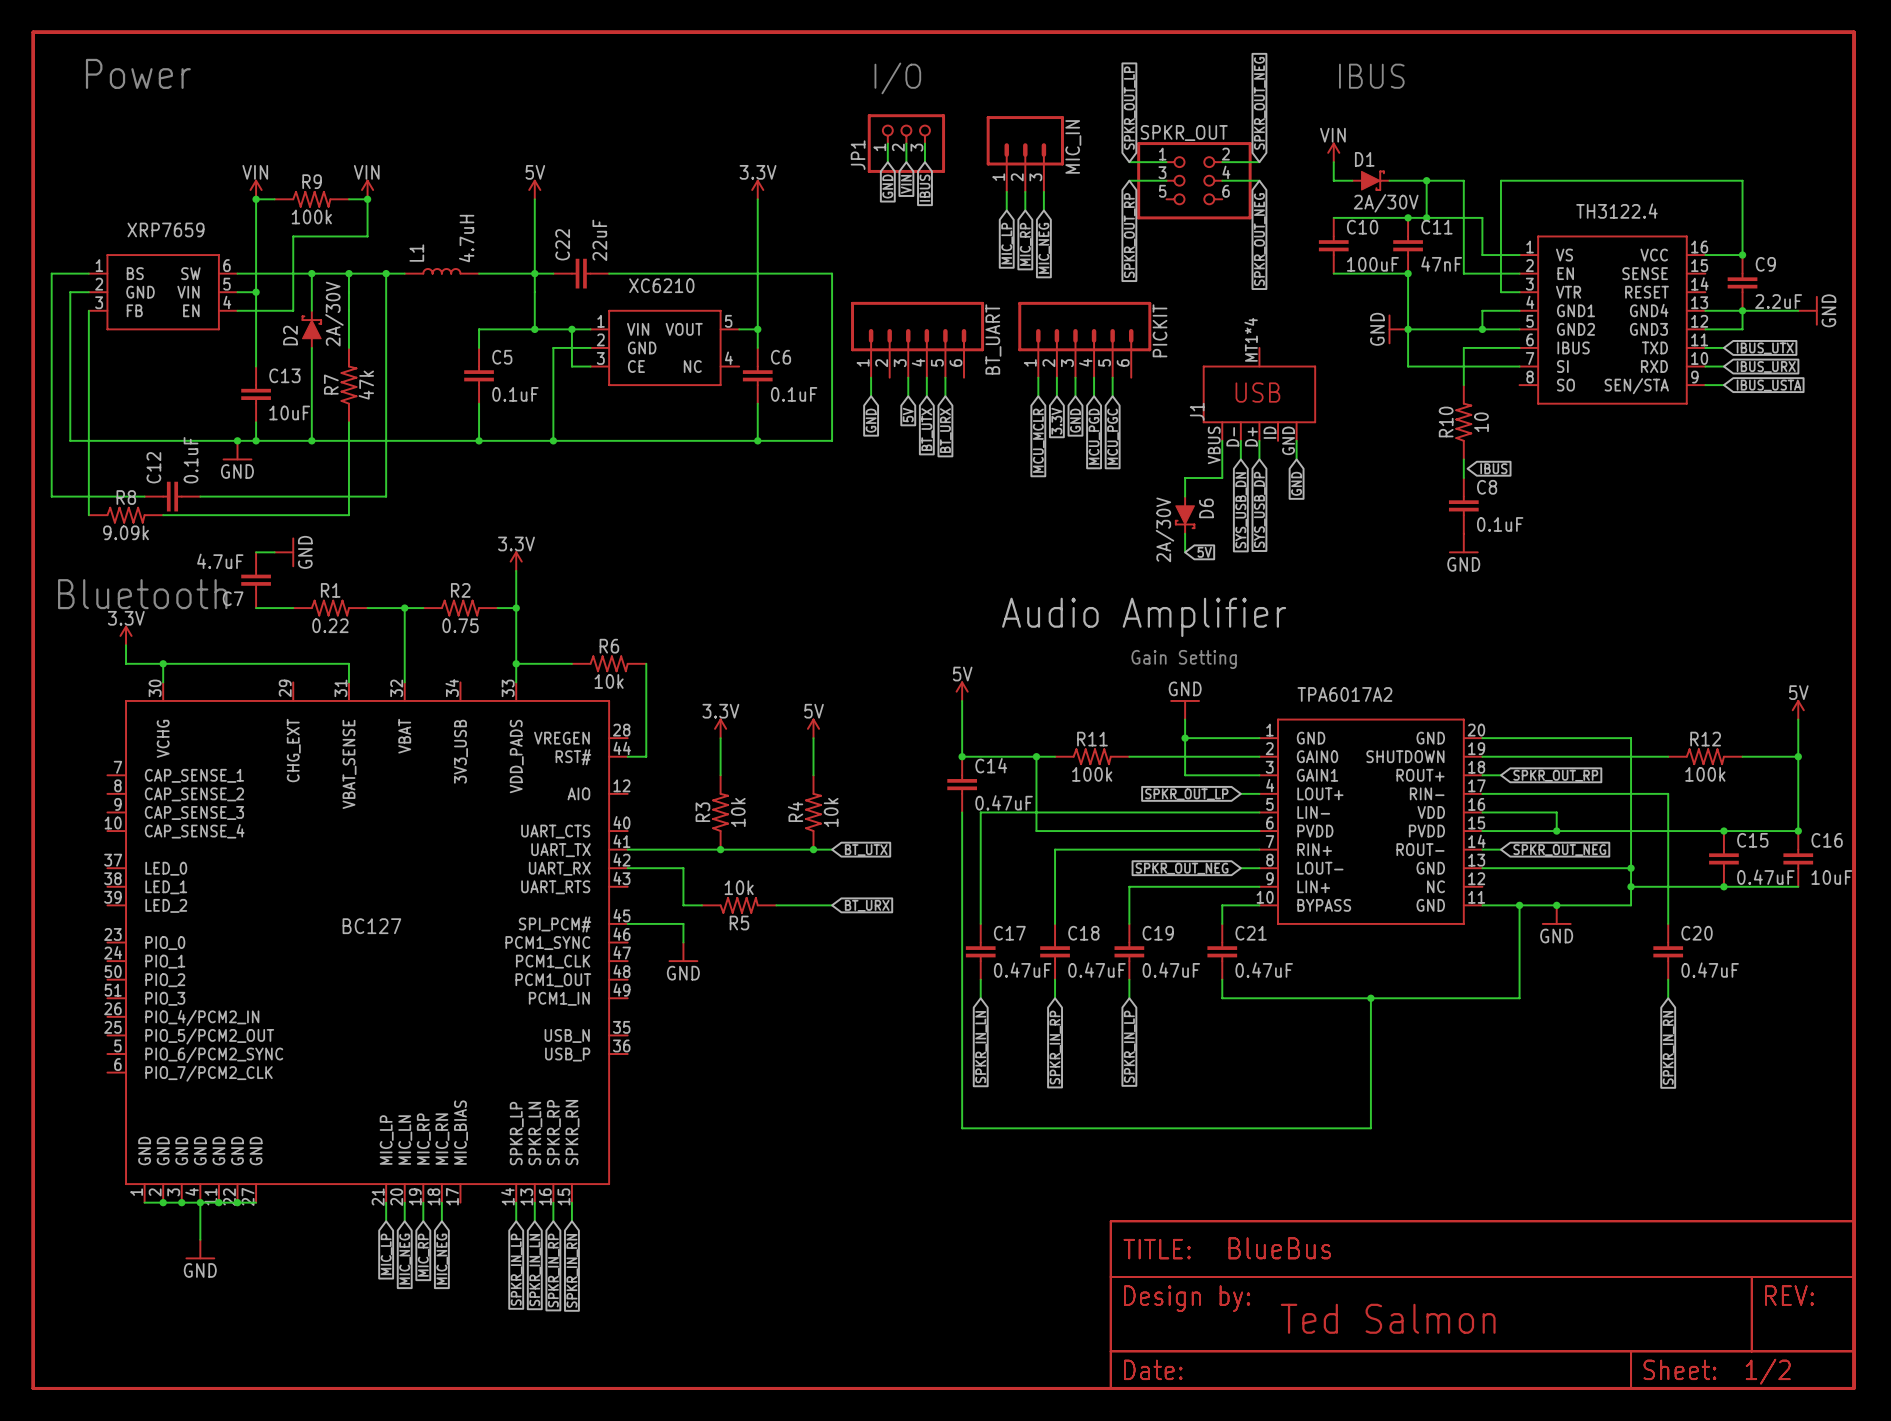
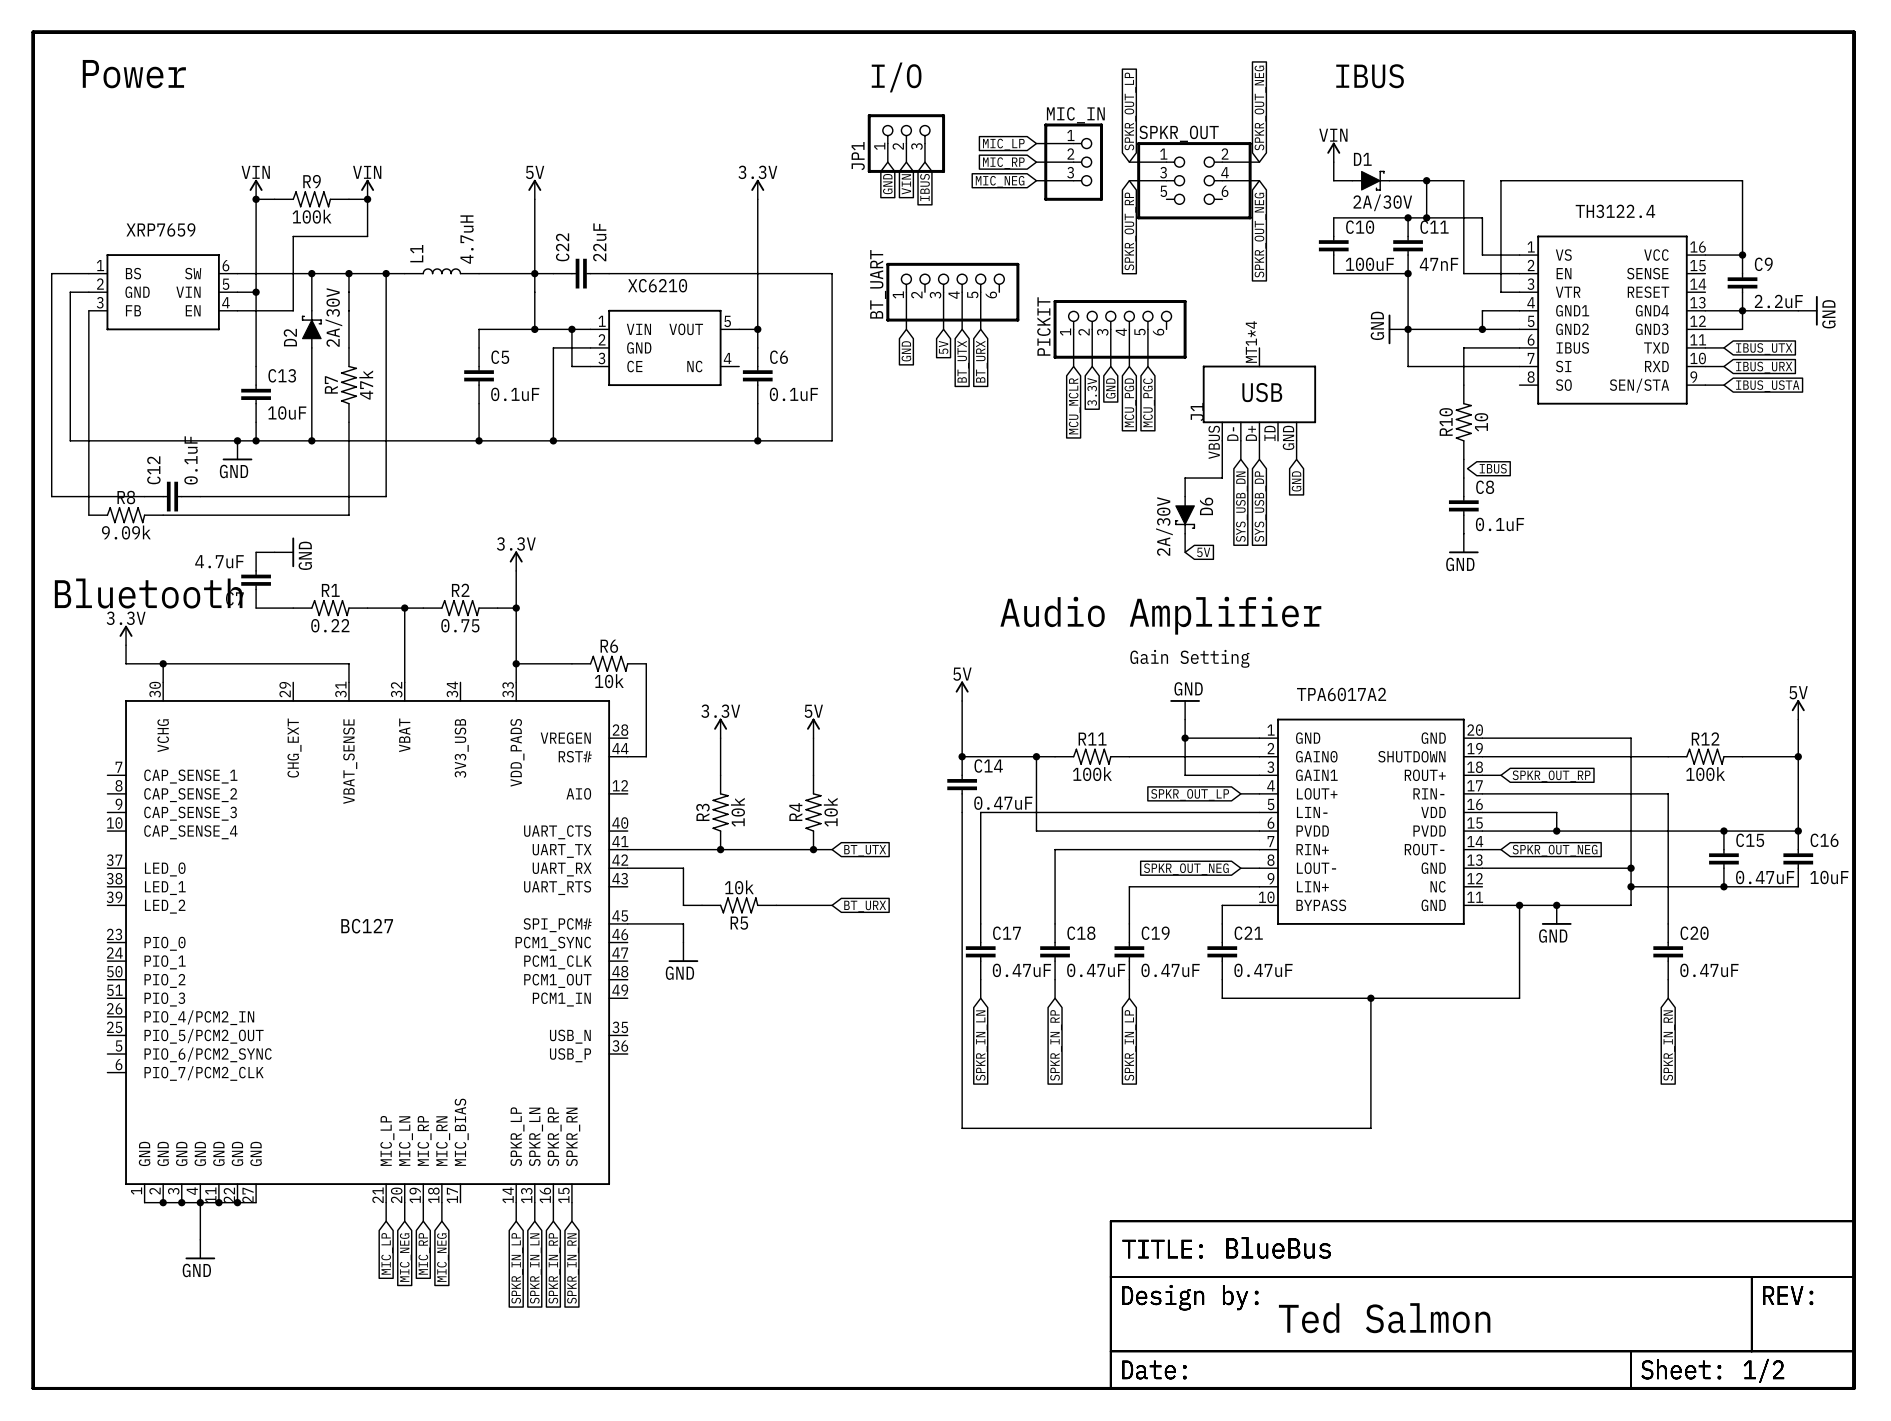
wire: none -> (1036, 143) (1073, 143)
MIC_IN: (1025, 153) -> none
wire: none -> (1036, 162) (1073, 162)
MIC_IN: none -> (1073, 162)
wire: none -> (1036, 180) (1073, 180)
wire: (1006, 191) (1006, 210) -> none
wire: (1025, 191) (1025, 210) -> none
wire: (1043, 191) (1043, 210) -> none
global label rotation: 0° (1007, 243) -> 90° clockwise (1003, 144)
global label position: MIC_LP (1007, 243) -> MIC_LP (1003, 144)
global label rotation: 0° (1025, 244) -> 90° clockwise (1003, 163)
global label position: MIC_RP (1025, 244) -> MIC_RP (1003, 163)
global label rotation: 0° (1044, 248) -> 90° clockwise (1000, 181)
global label position: MIC_NEG (1044, 248) -> MIC_NEG (1000, 181)
wire: none -> (906, 292) (906, 329)
wire: none -> (943, 292) (943, 329)
BT_UART: none -> (952, 292)
wire: none -> (962, 292) (962, 329)
wire: none -> (980, 292) (980, 329)
wire: none -> (1073, 329) (1073, 366)
wire: none -> (1092, 329) (1092, 366)
wire: none -> (1110, 329) (1110, 366)
PICKIT: none -> (1120, 329)
wire: none -> (1129, 329) (1129, 366)
wire: none -> (1147, 329) (1147, 366)
BT_UART: (917, 339) -> none
PICKIT: (1084, 339) -> none
wire: (871, 377) (871, 396) -> none
wire: (908, 377) (908, 396) -> none
wire: (926, 377) (926, 396) -> none
wire: (945, 377) (945, 396) -> none
wire: (1038, 377) (1038, 396) -> none
wire: (1056, 377) (1056, 396) -> none
wire: (1075, 377) (1075, 396) -> none
wire: (1094, 377) (1094, 396) -> none
wire: (1112, 377) (1112, 396) -> none
global label position: 5V (908, 415) -> 5V (943, 347)
global label position: GND (871, 420) -> GND (906, 351)
global label position: GND (1075, 420) -> GND (1110, 388)
global label position: 3.3V (1056, 421) -> 3.3V (1092, 391)
global label position: BT_UTX (927, 429) -> BT_UTX (963, 361)
global label position: BT_URX (945, 430) -> BT_URX (981, 361)
global label position: MCU_PGD (1094, 436) -> MCU_PGD (1130, 402)
global label position: MCU_PGC (1113, 436) -> MCU_PGC (1148, 402)
global label position: MCU_MCLR (1038, 440) -> MCU_MCLR (1074, 406)

